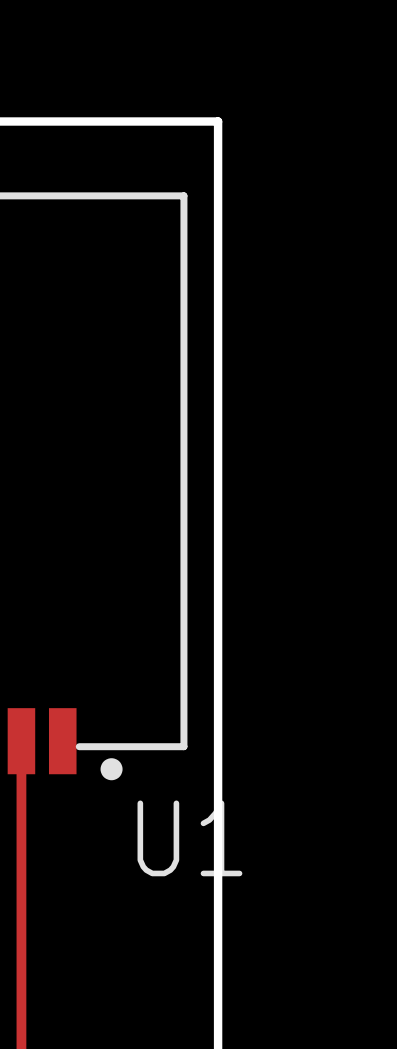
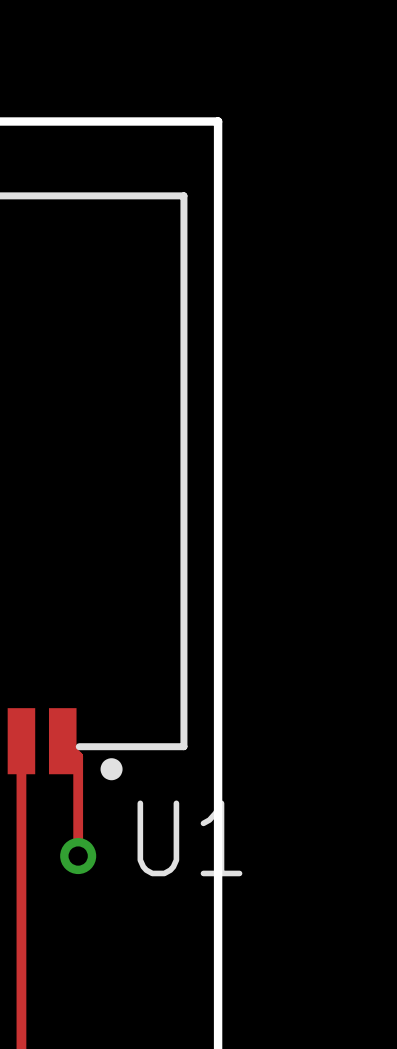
track: none -> (62, 741) (78, 756) (78, 856)
via: none -> (78, 856)

